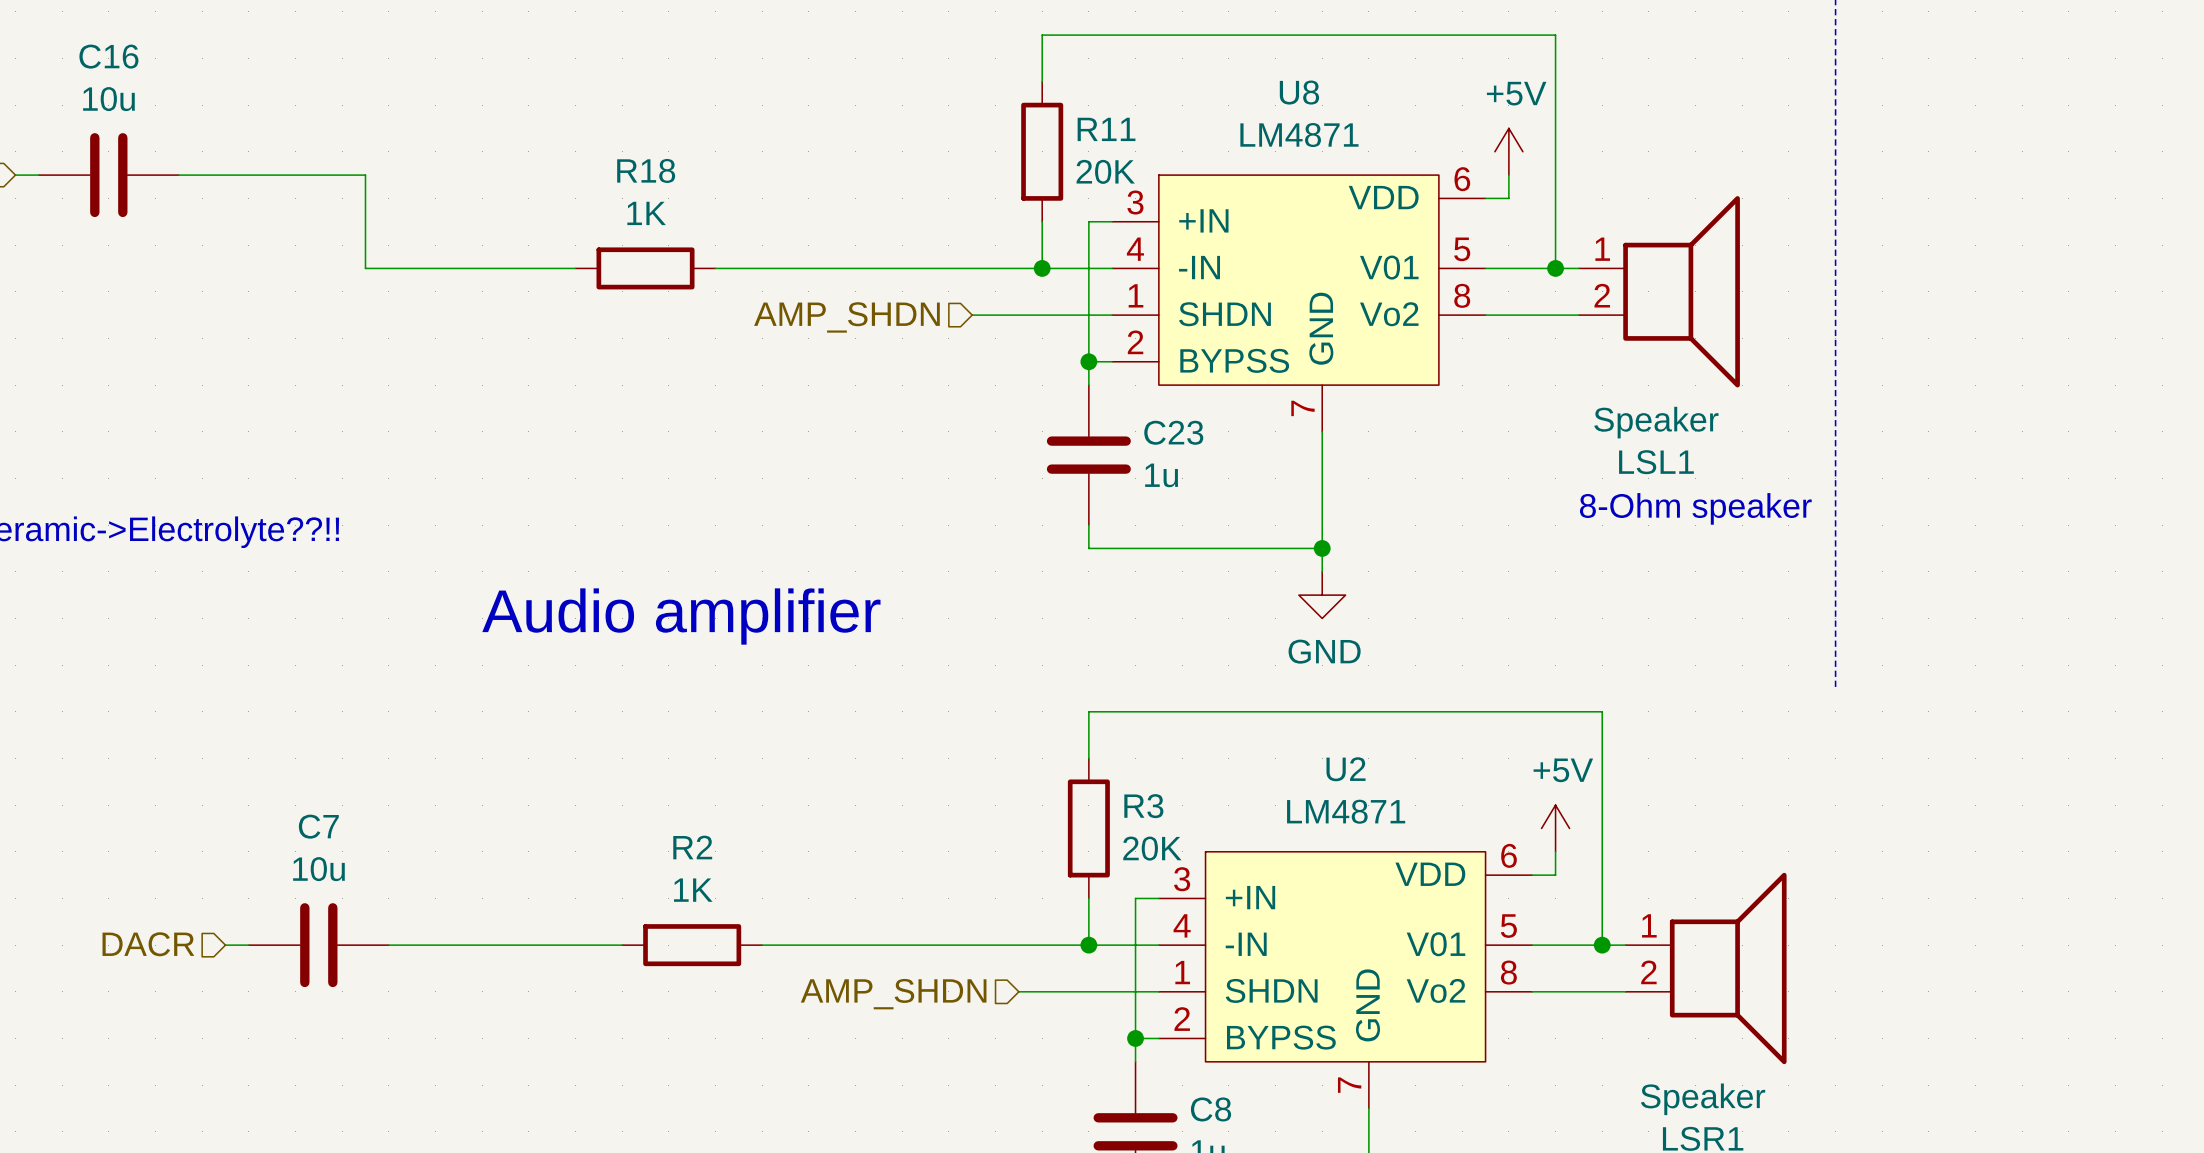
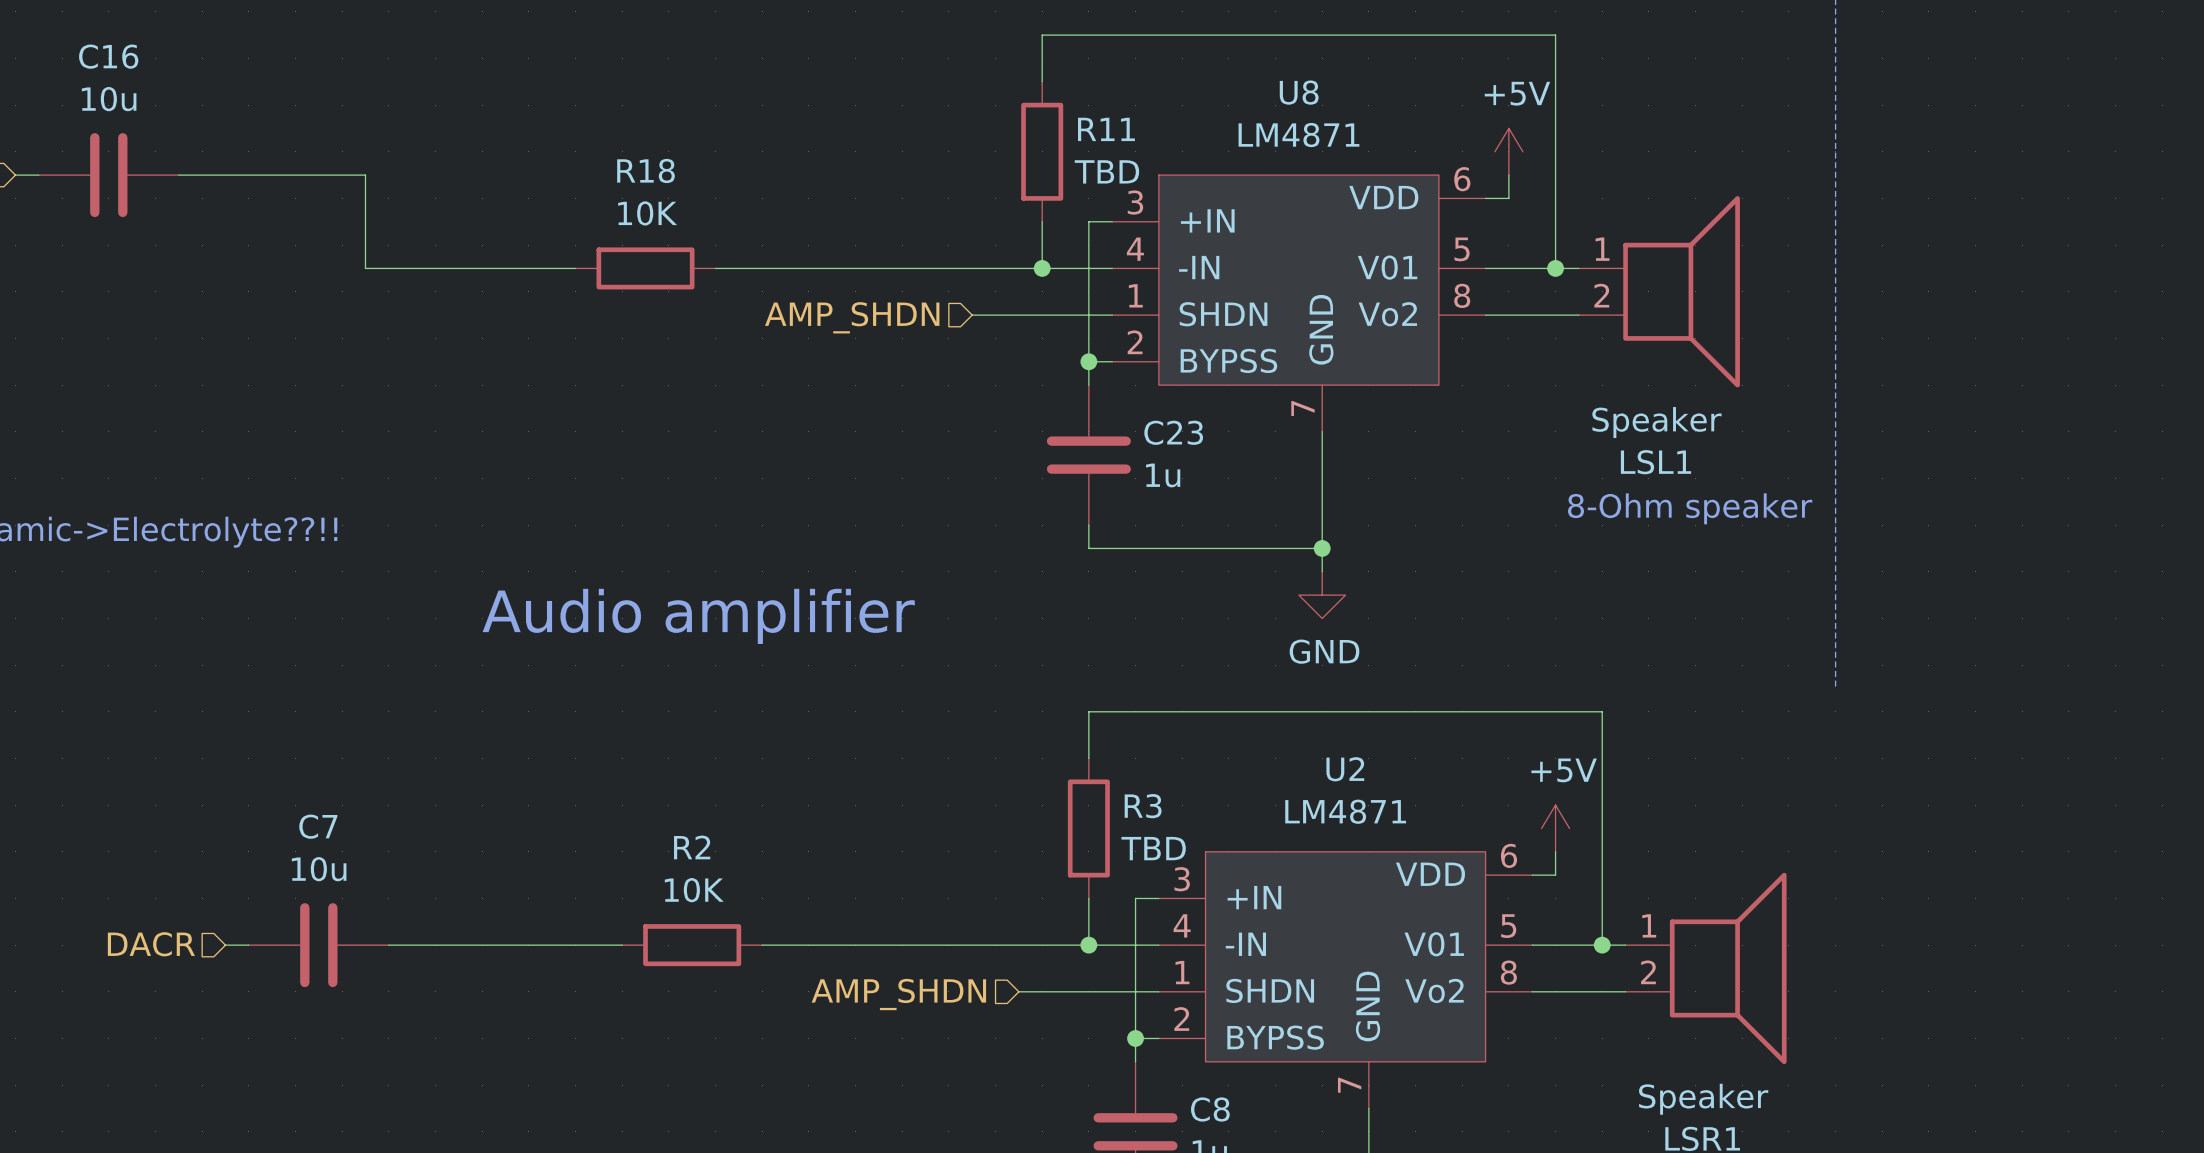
R11 value: 20K (1105, 171) -> TBD (1106, 171)
R18 value: 1K (646, 213) -> 10K (647, 213)
R3 value: 20K (1152, 848) -> TBD (1153, 848)
R2 value: 1K (693, 890) -> 10K (694, 890)

